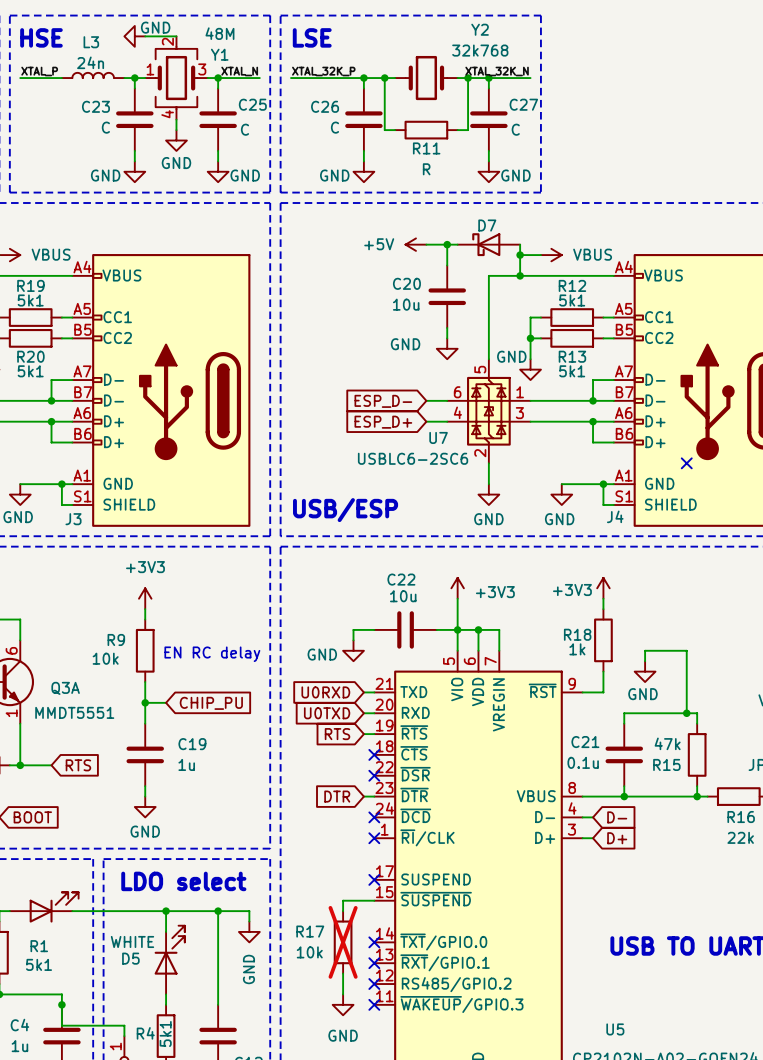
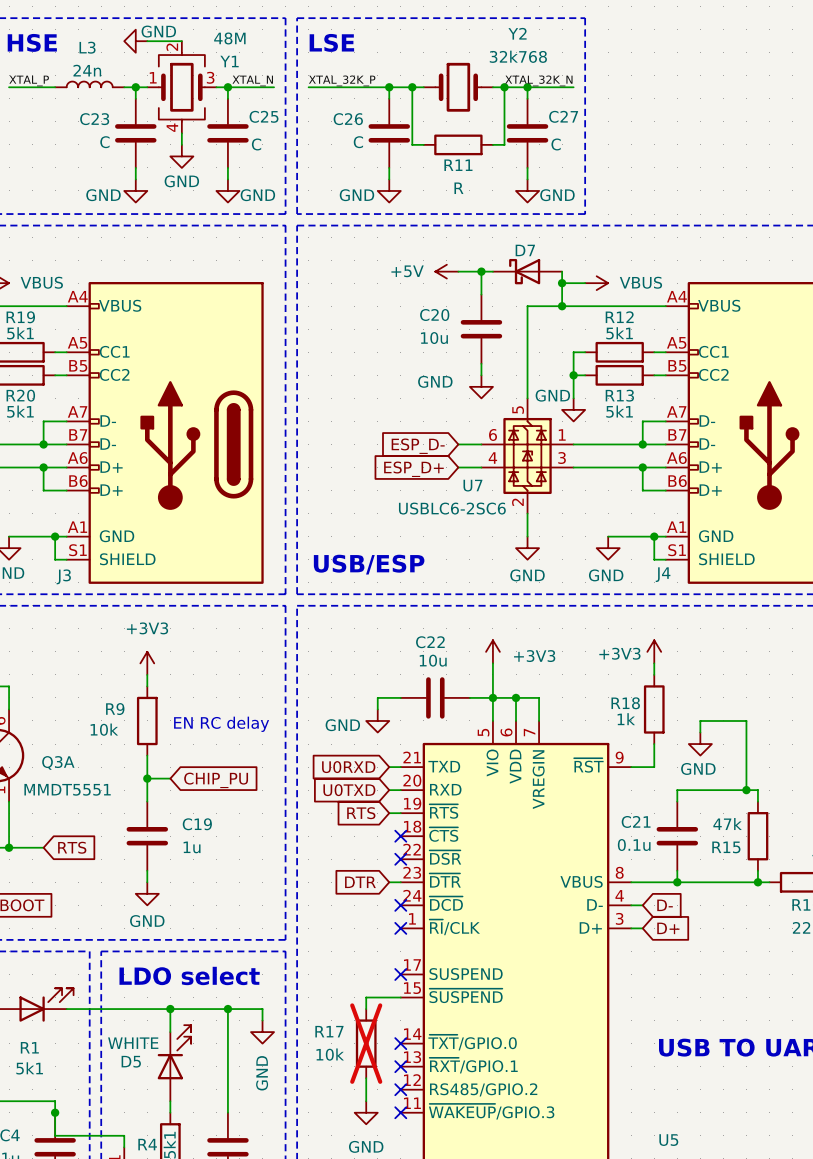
no-connect mark: (686, 463) -> none

